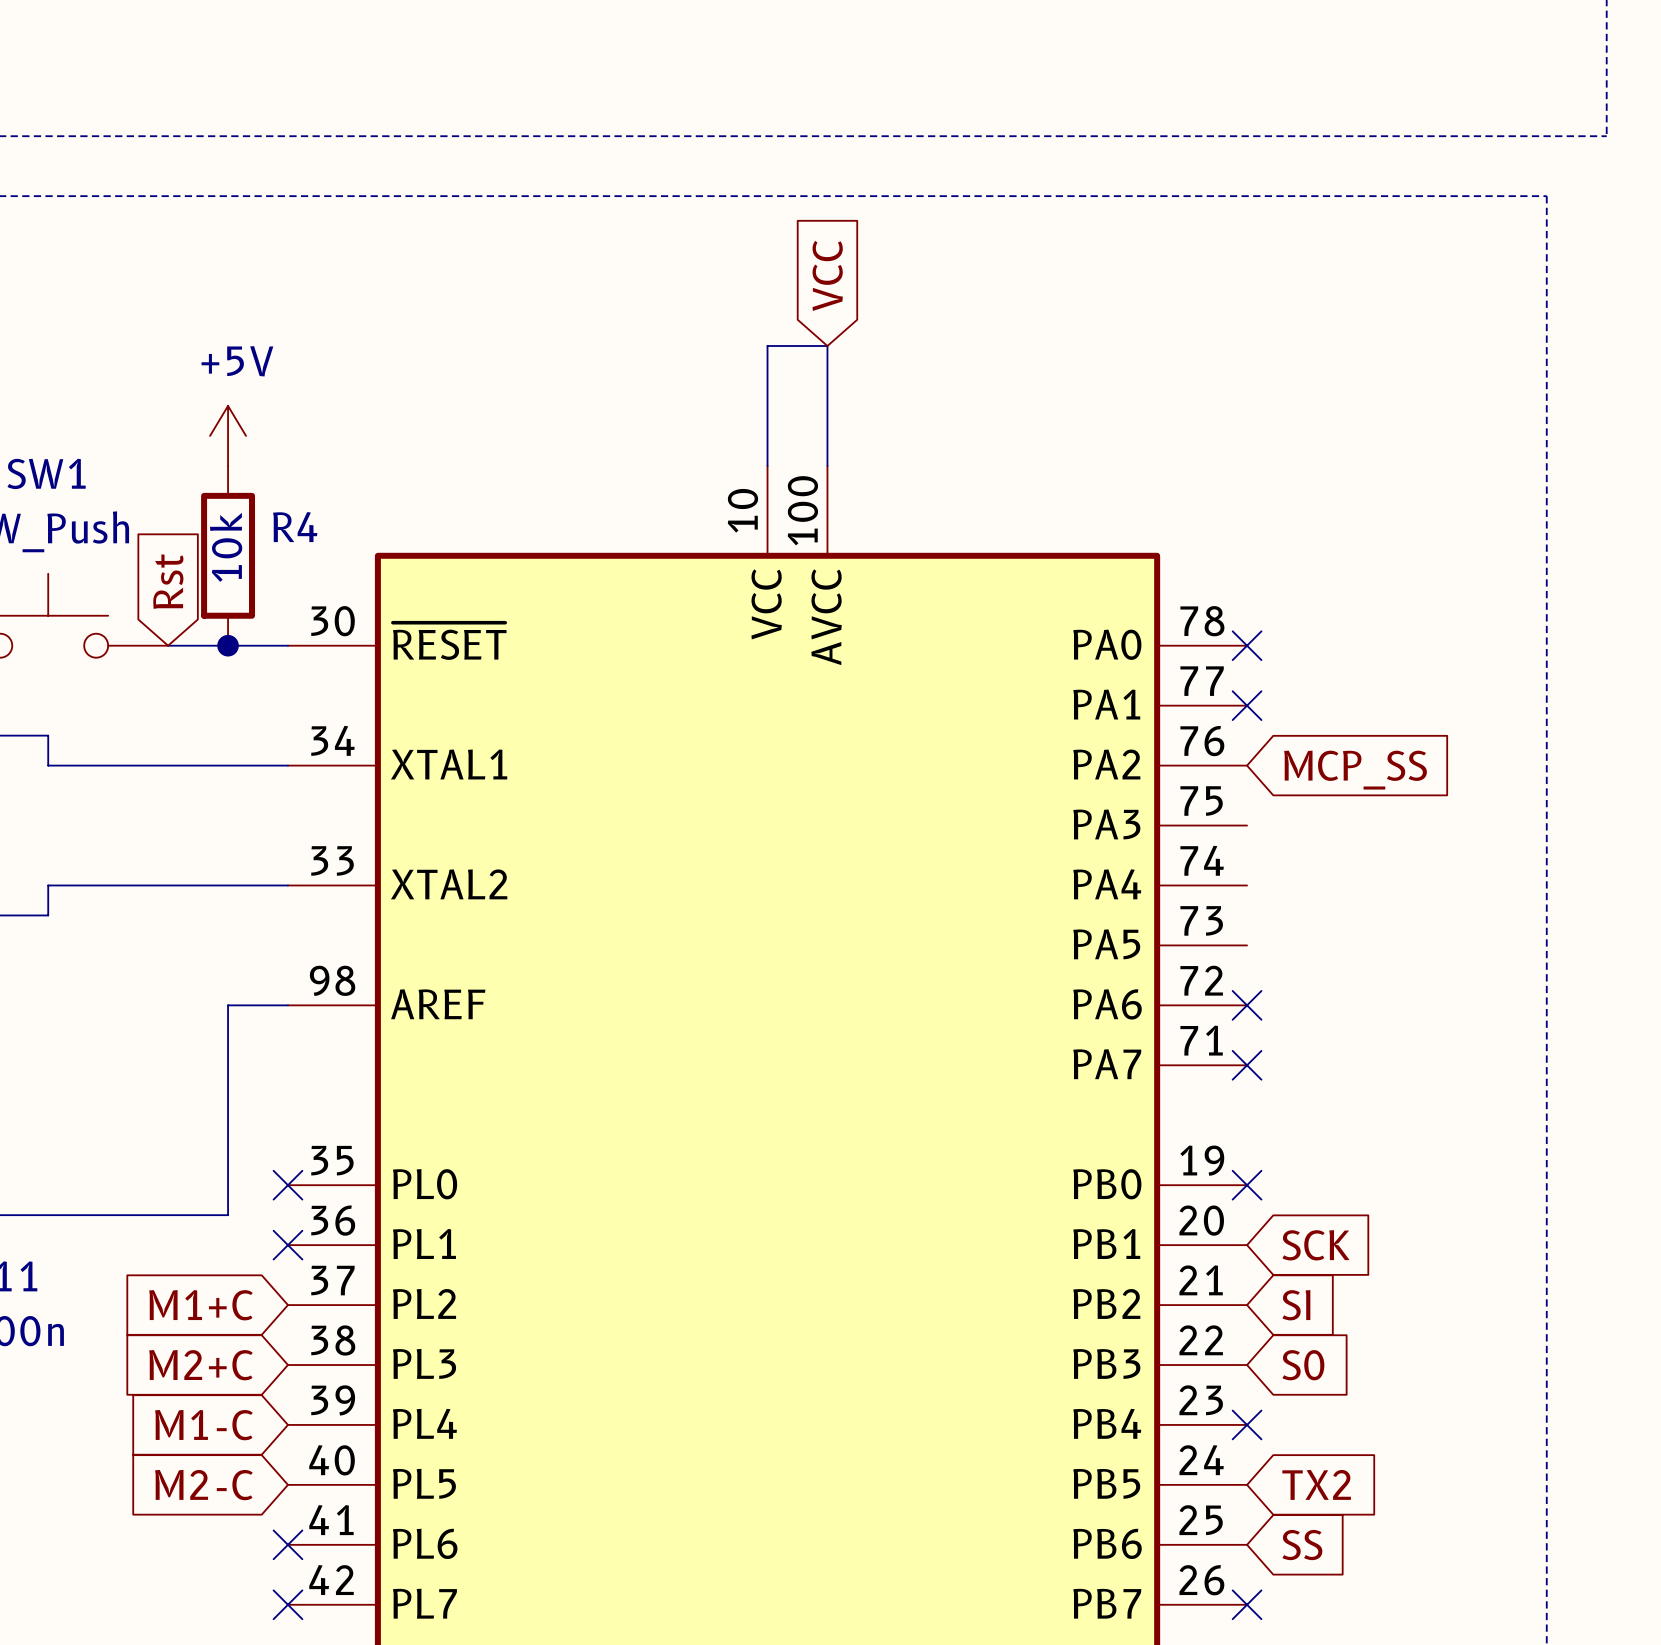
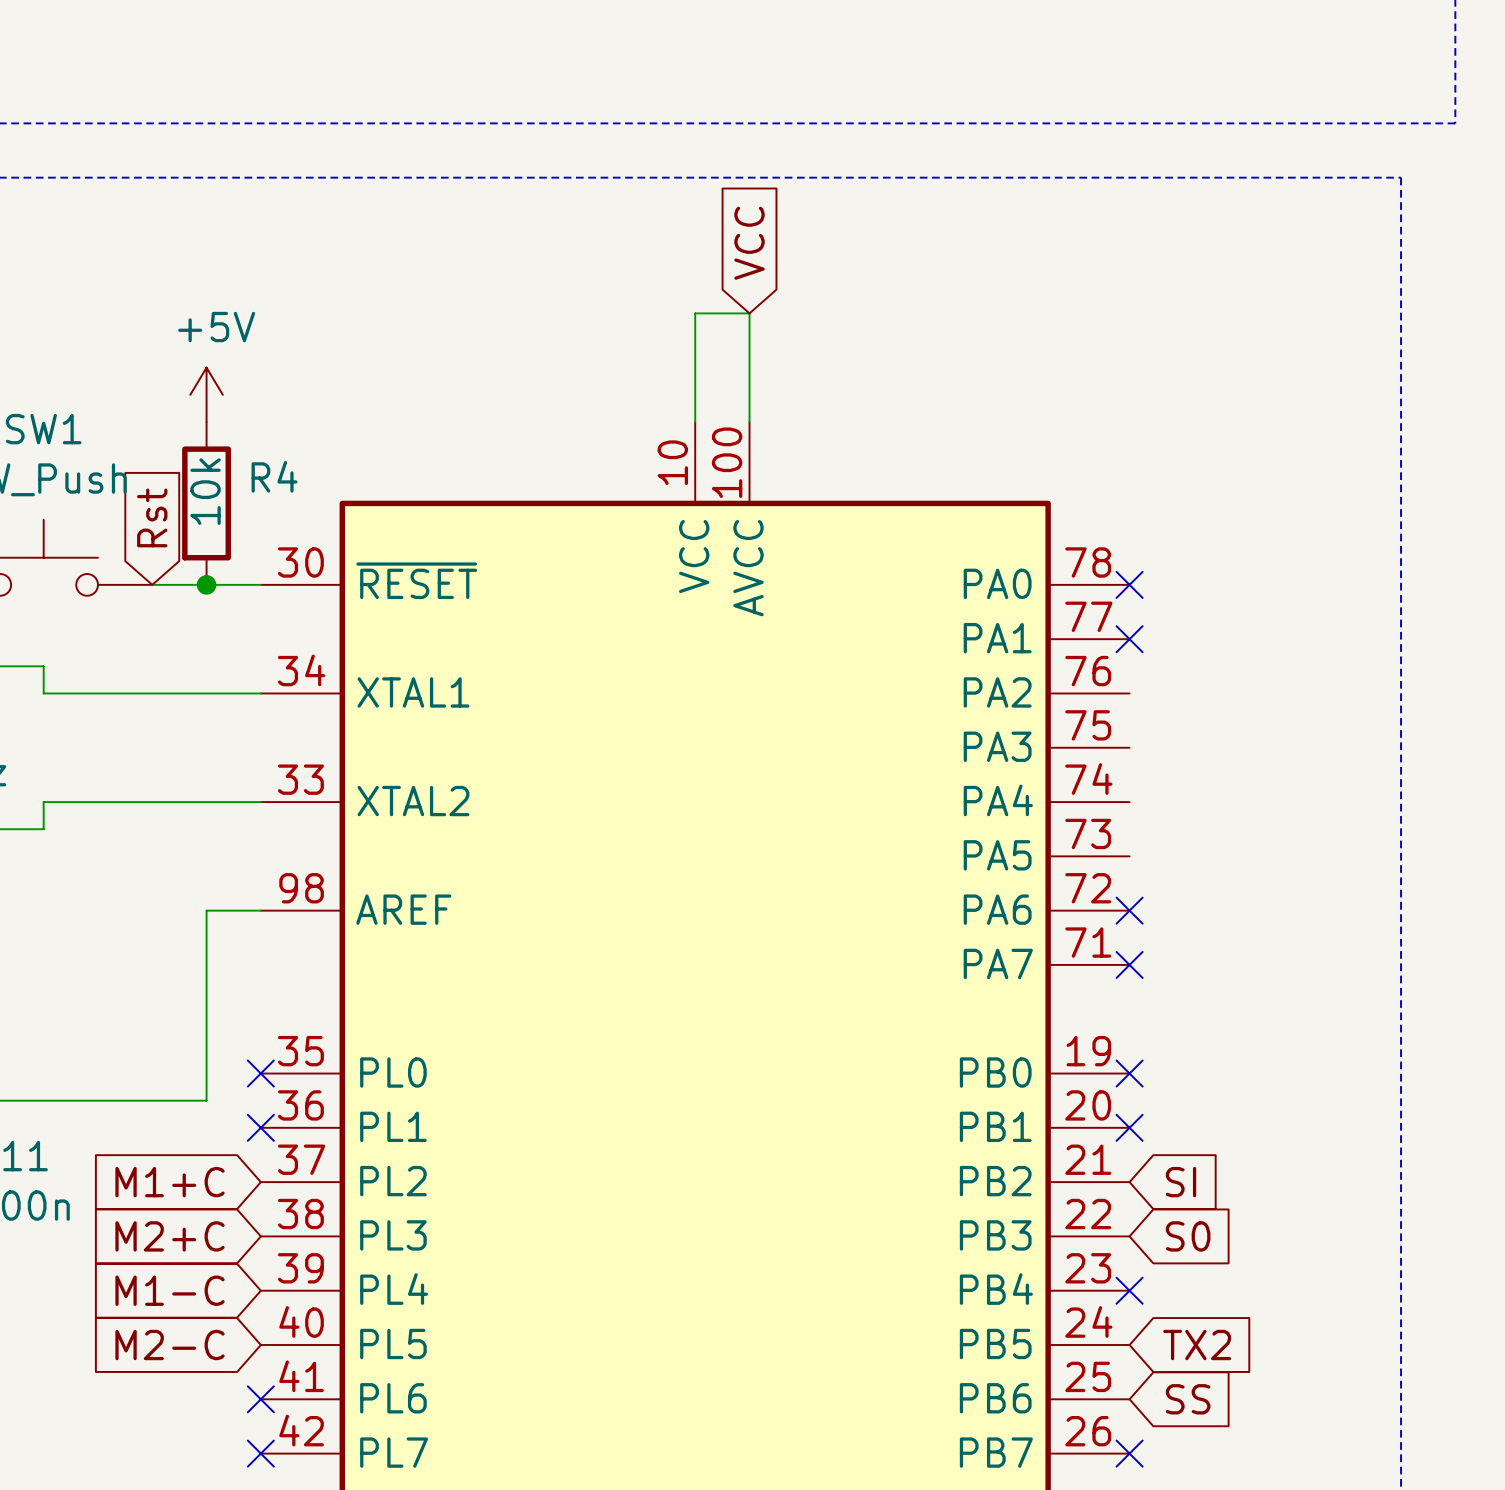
global label: MCP_SS (1355, 770) -> none
no-connect mark: none -> (1129, 1127)
global label: SCK (1315, 1245) -> none

